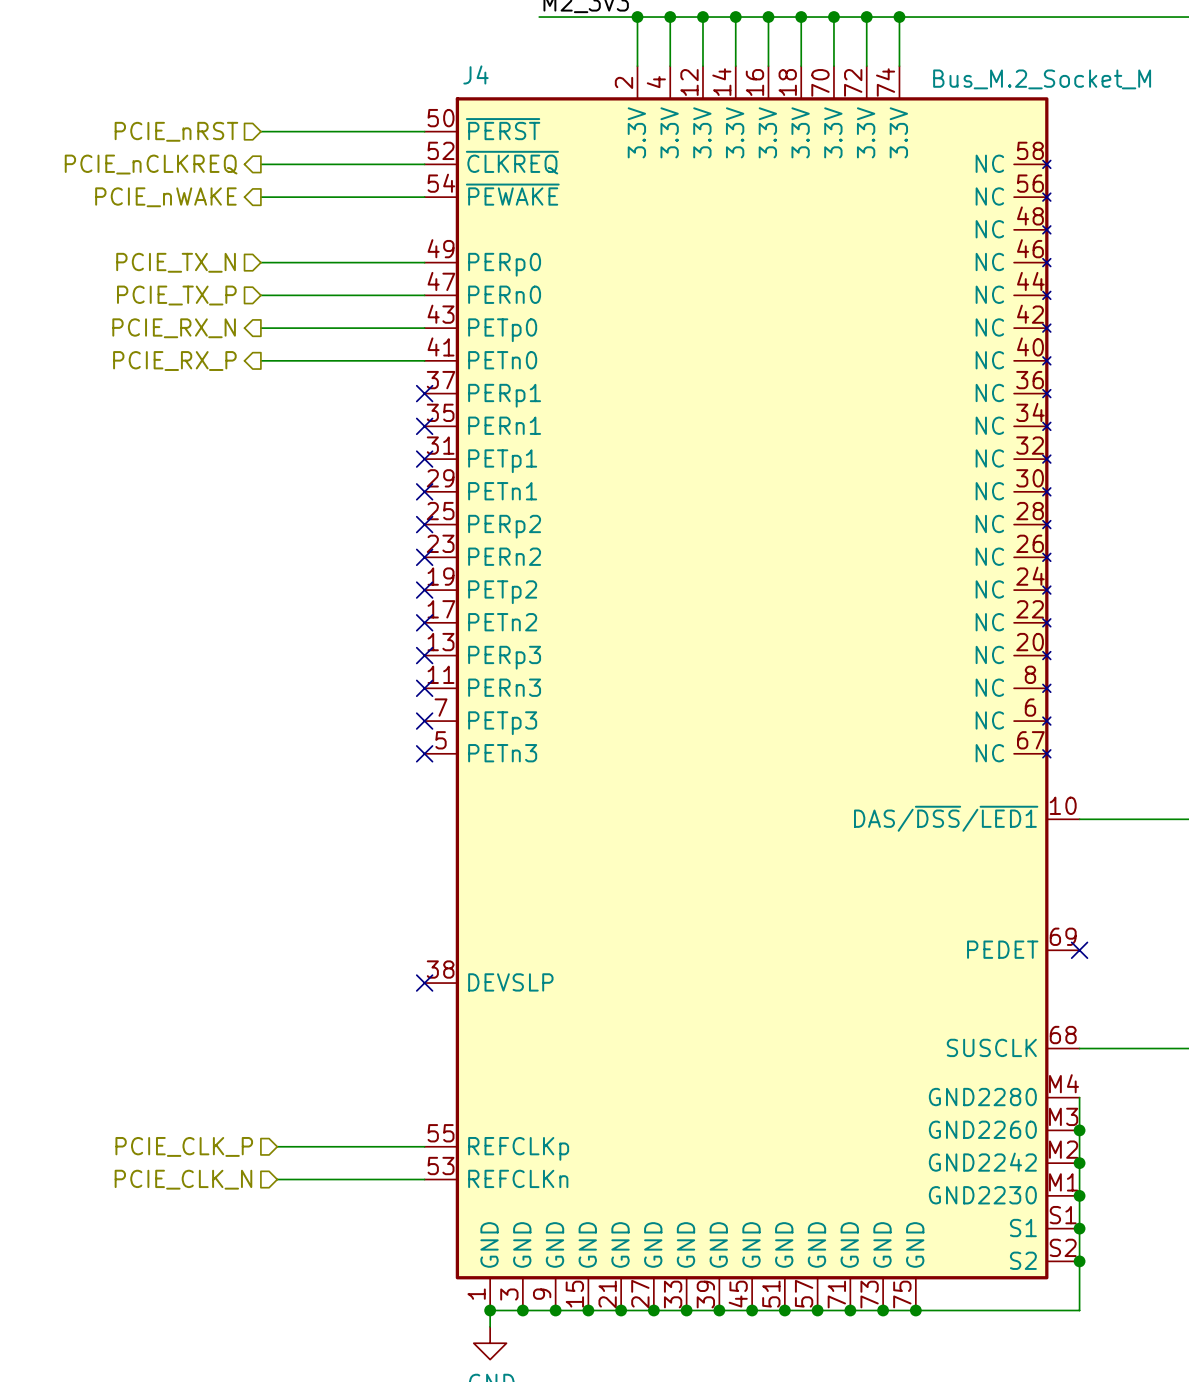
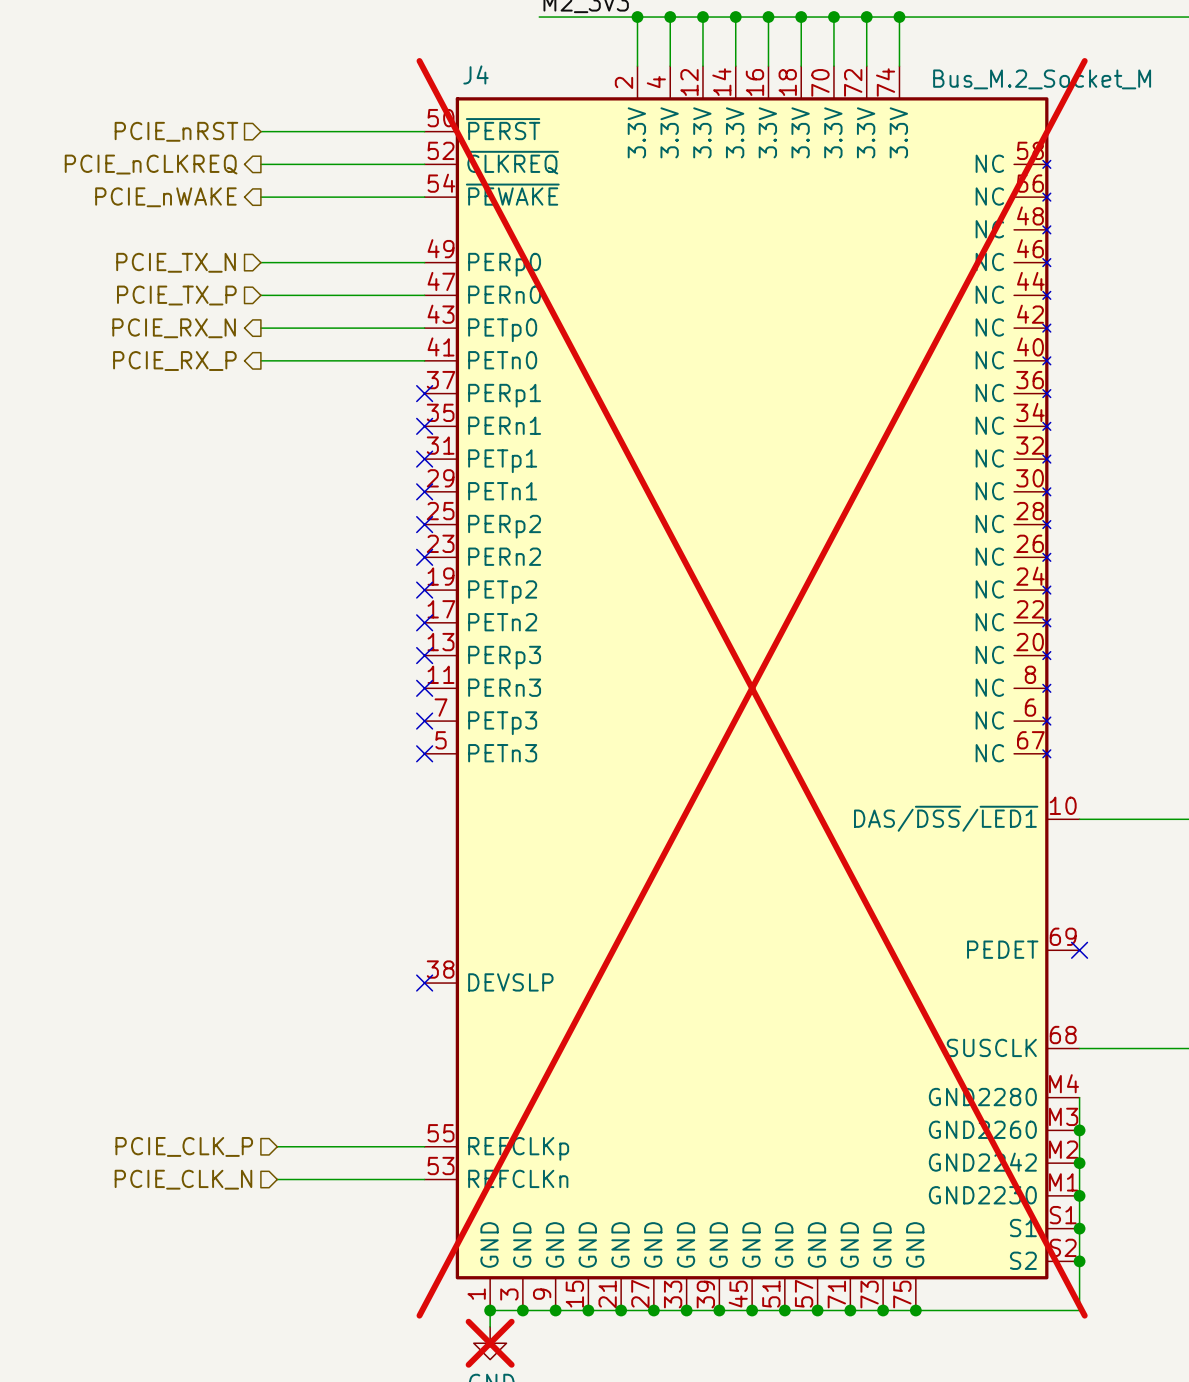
J4 do-not-place cross: none -> (752, 688)
power symbol do-not-place cross: none -> (490, 1343)

